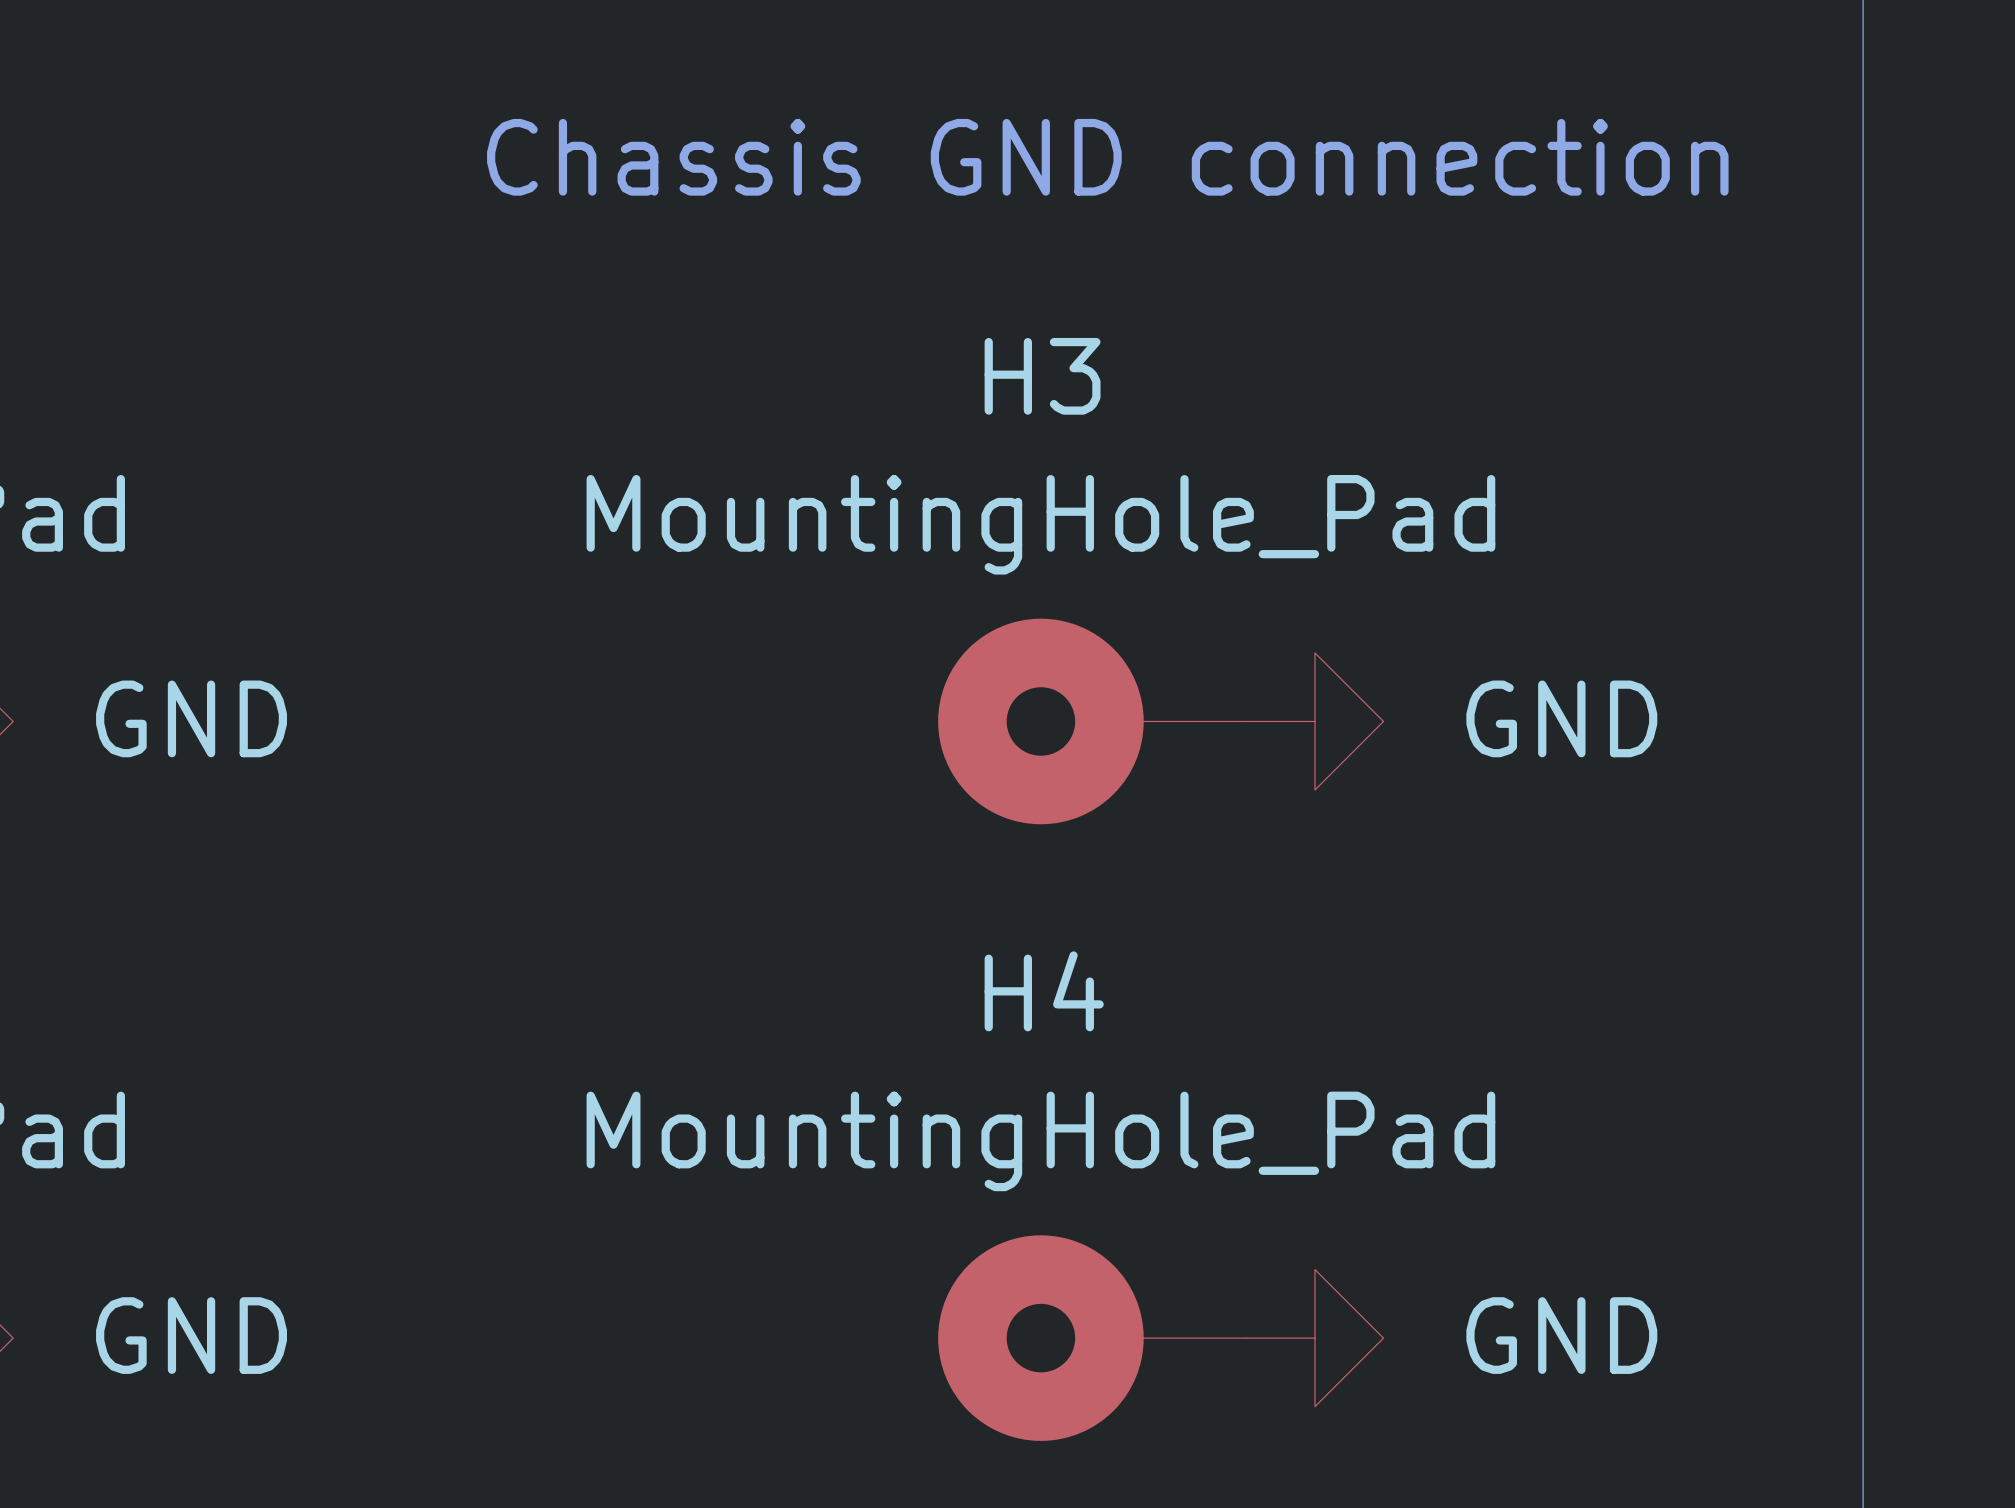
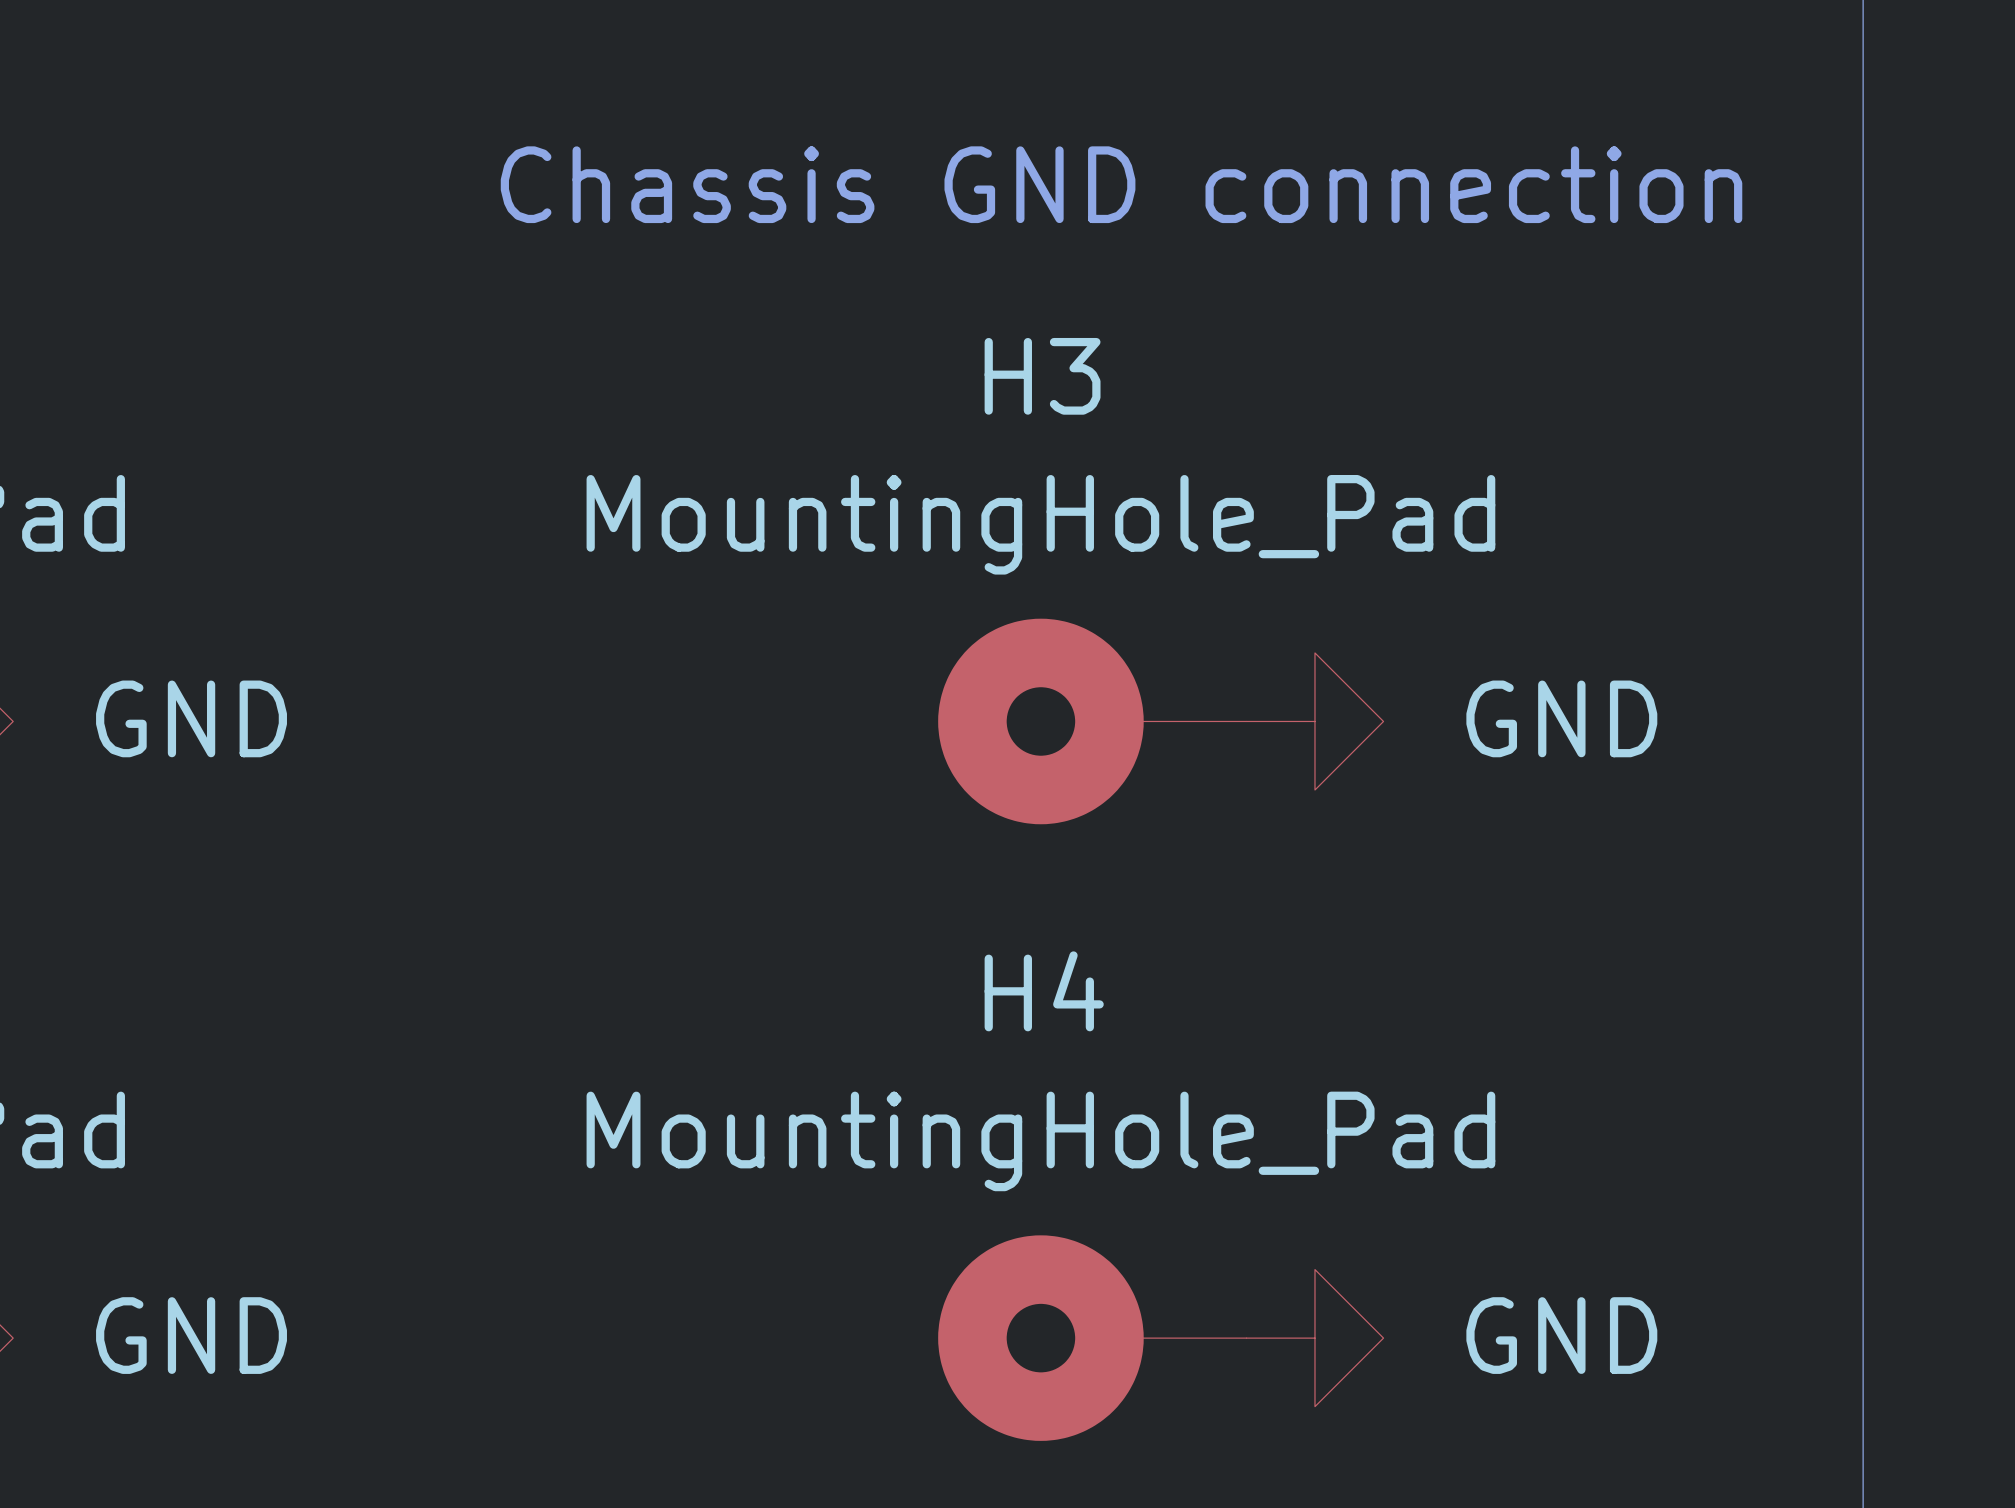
text position: Chassis GND connection (1107, 157) -> Chassis GND connection (1121, 184)

